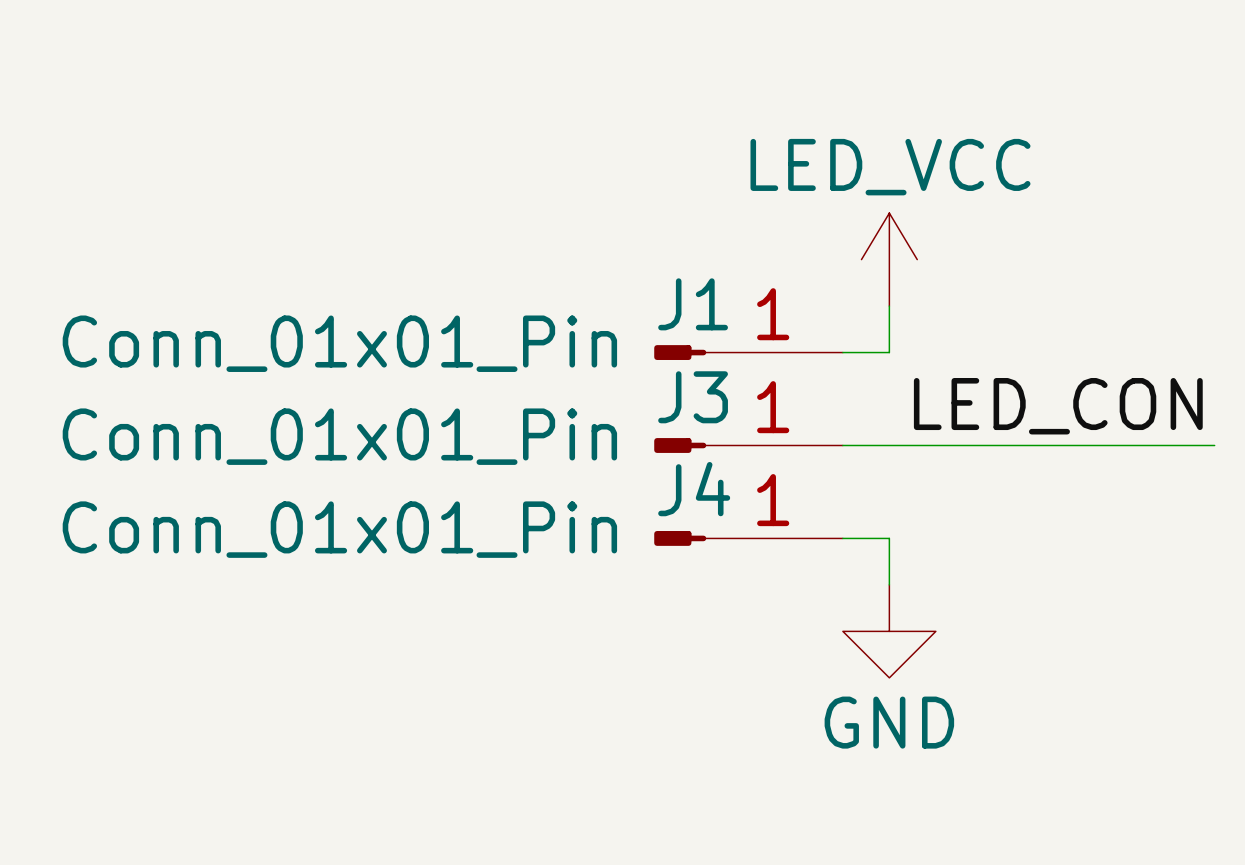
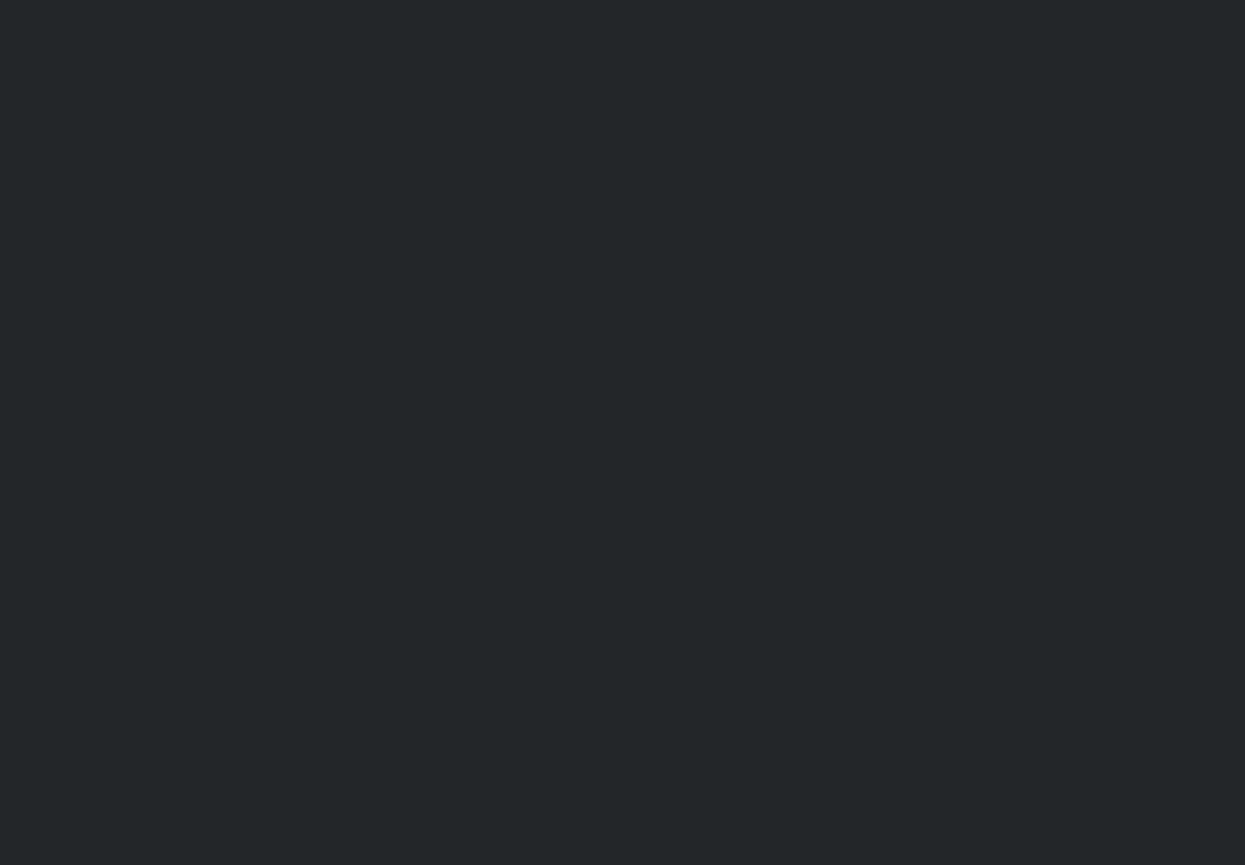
power symbol: LED_VCC (889, 259) -> none
wire: (889, 306) (889, 352) (842, 352) -> none
J1: Conn_01x01_Pin (748, 352) -> none
label: LED_CON (1058, 406) -> none
J3: Conn_01x01_Pin (748, 445) -> none
wire: (842, 445) (1214, 445) -> none
J4: Conn_01x01_Pin (748, 538) -> none
wire: (842, 538) (889, 538) (889, 584) -> none
power symbol: GND (889, 631) -> none

